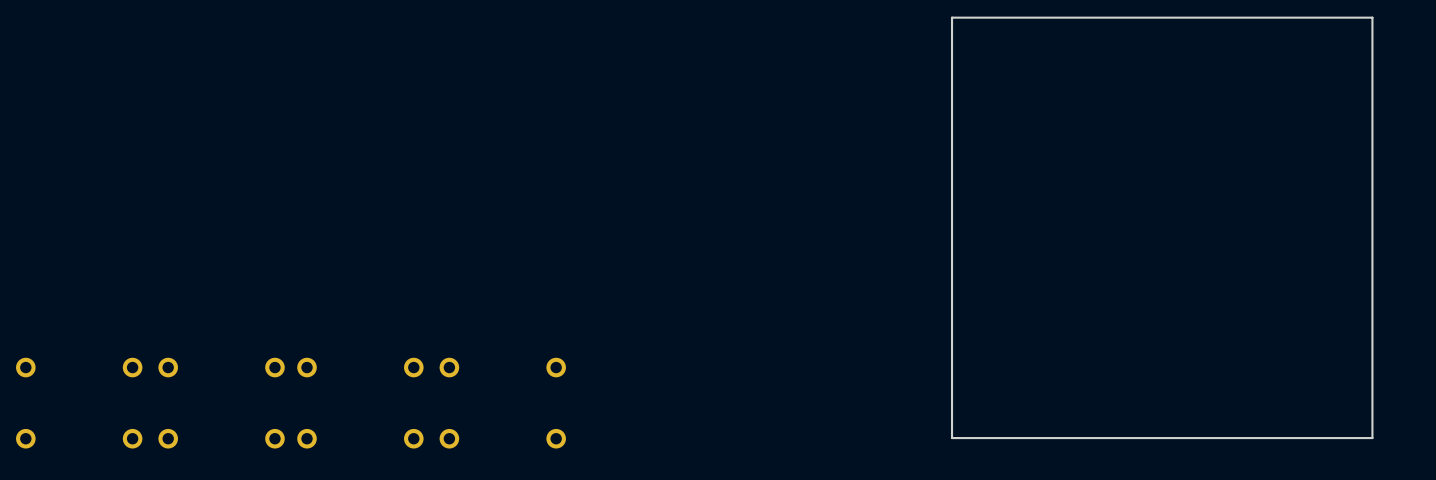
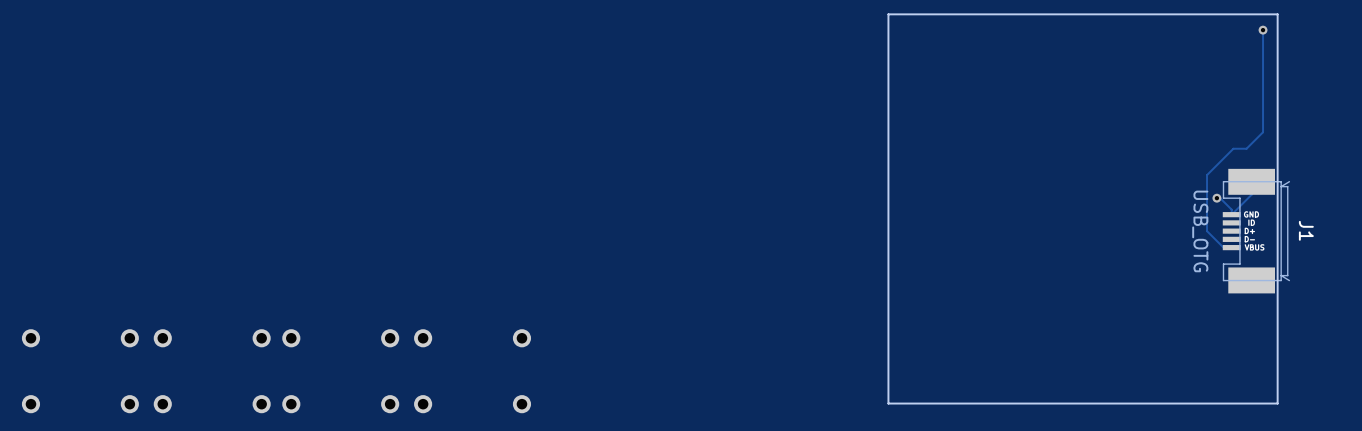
track: none -> (1263, 30) (1263, 132) (1246, 148) (1233, 148) (1207, 175) (1207, 231) (1223, 247) (1231, 247)
via: none -> (1263, 30)
track: none -> (1251, 181) (1251, 194) (1231, 214) (1231, 209) (1220, 198) (1216, 198)
via: none -> (1216, 198)
J1: none -> USB_OTG (1256, 231)

